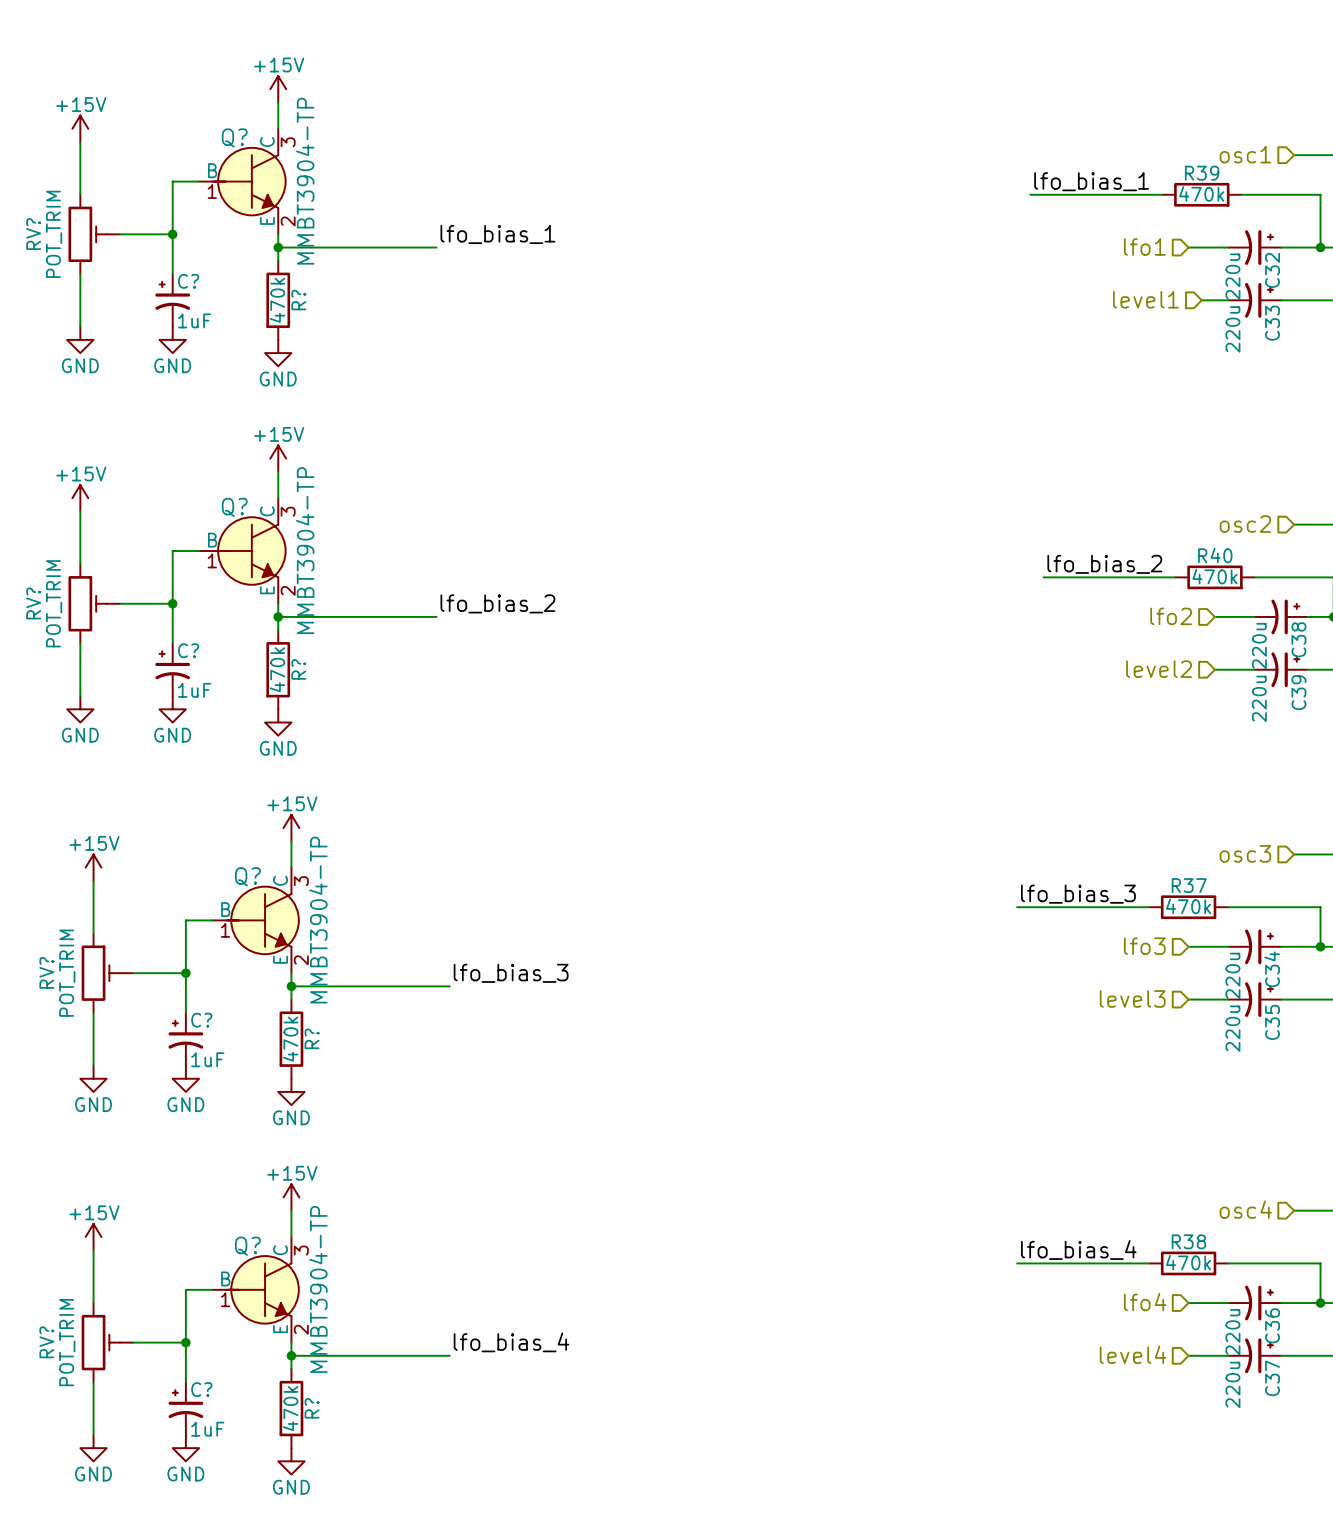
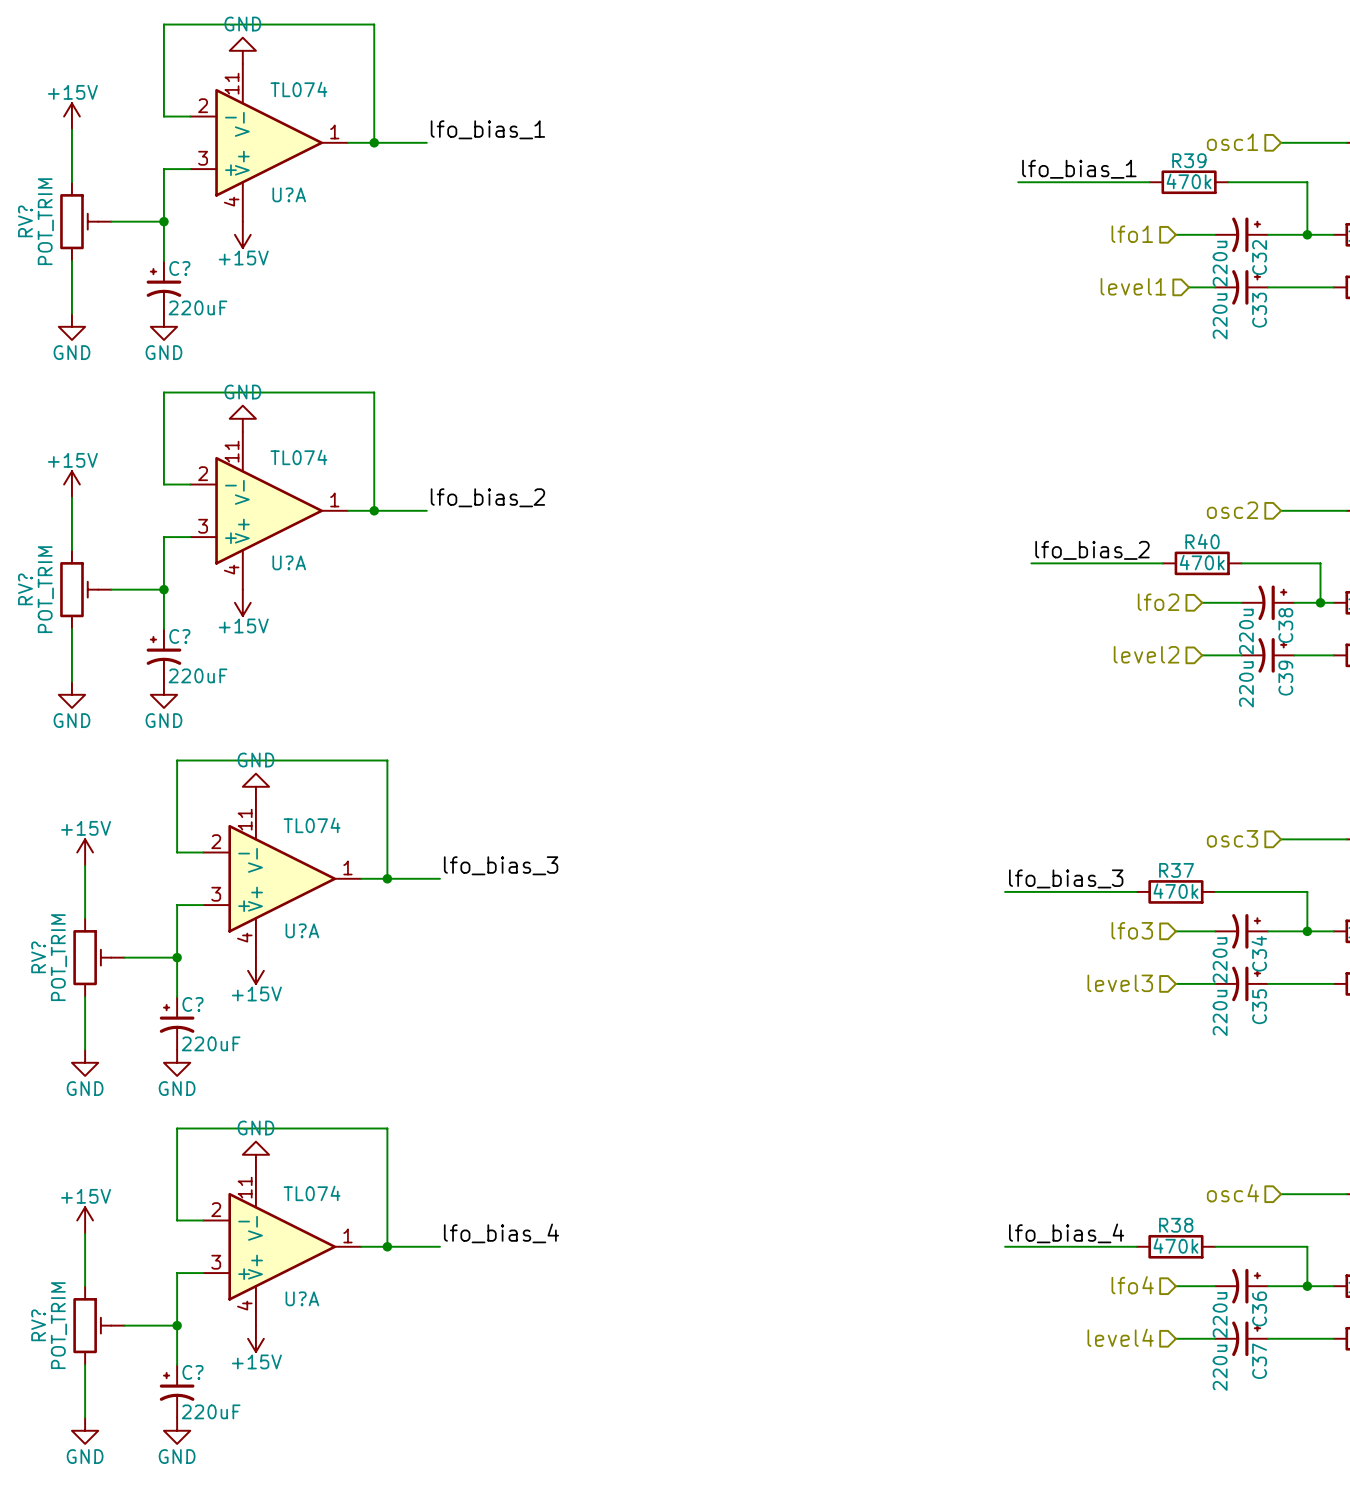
power symbol: none -> GND (242, 50)
power symbol: +15V (278, 89) -> none
wire: (278, 102) (278, 128) -> none
wire: none -> (190, 116) (163, 116) (163, 24) (374, 24) (374, 142)
U?A: none -> TL074 (269, 142)
wire: none -> (347, 142) (426, 142)
junction: none -> (374, 142)
Q?: MMBT3904-TP (242, 181) -> none
wire: (278, 234) (278, 260) -> none
label position: lfo_bias_1 (497, 234) -> lfo_bias_1 (487, 129)
power symbol: none -> +15V (242, 234)
wire: (278, 247) (436, 247) -> none
junction: (278, 247) -> none
R?: 470k (278, 300) -> none
C? value: 1uF (194, 320) -> 220uF (197, 307)
power symbol rotation: 0° (278, 353) -> 180° (242, 418)
power symbol position: GND (278, 353) -> GND (242, 418)
power symbol: +15V (278, 458) -> none
wire: (278, 471) (278, 498) -> none
wire: none -> (190, 484) (163, 484) (163, 392) (374, 392) (374, 510)
U?A: none -> TL074 (269, 510)
wire: none -> (347, 510) (426, 510)
junction: none -> (374, 510)
Q?: MMBT3904-TP (242, 551) -> none
wire: (278, 603) (278, 630) -> none
label position: lfo_bias_2 (497, 603) -> lfo_bias_2 (487, 497)
power symbol: none -> +15V (242, 602)
wire: (278, 616) (436, 616) -> none
junction: (278, 616) -> none
R?: 470k (278, 669) -> none
C? value: 1uF (194, 690) -> 220uF (197, 675)
power symbol rotation: 0° (278, 722) -> 180° (255, 786)
power symbol position: GND (278, 722) -> GND (255, 786)
power symbol: +15V (291, 828) -> none
wire: (291, 841) (291, 867) -> none
wire: none -> (203, 852) (177, 852) (177, 760) (387, 760) (387, 878)
U?A: none -> TL074 (282, 878)
wire: none -> (361, 878) (439, 878)
junction: none -> (387, 878)
Q?: MMBT3904-TP (255, 920) -> none
wire: (291, 973) (291, 999) -> none
label position: lfo_bias_3 (511, 973) -> lfo_bias_3 (501, 865)
power symbol: none -> +15V (255, 970)
wire: (291, 986) (449, 986) -> none
junction: (291, 986) -> none
R?: 470k (291, 1039) -> none
C? value: 1uF (207, 1059) -> 220uF (211, 1043)
power symbol rotation: 0° (291, 1091) -> 180° (255, 1154)
power symbol position: GND (291, 1091) -> GND (255, 1154)
power symbol: +15V (291, 1197) -> none
wire: (291, 1210) (291, 1237) -> none
wire: none -> (203, 1220) (177, 1220) (177, 1128) (387, 1128) (387, 1246)
U?A: none -> TL074 (282, 1246)
wire: none -> (361, 1246) (439, 1246)
junction: none -> (387, 1246)
Q?: MMBT3904-TP (255, 1289) -> none
wire: (291, 1342) (291, 1368) -> none
label position: lfo_bias_4 (511, 1342) -> lfo_bias_4 (501, 1233)
power symbol: none -> +15V (255, 1338)
wire: (291, 1355) (449, 1355) -> none
junction: (291, 1355) -> none
R?: 470k (291, 1408) -> none
C? value: 1uF (207, 1429) -> 220uF (211, 1411)
power symbol: GND (291, 1461) -> none

